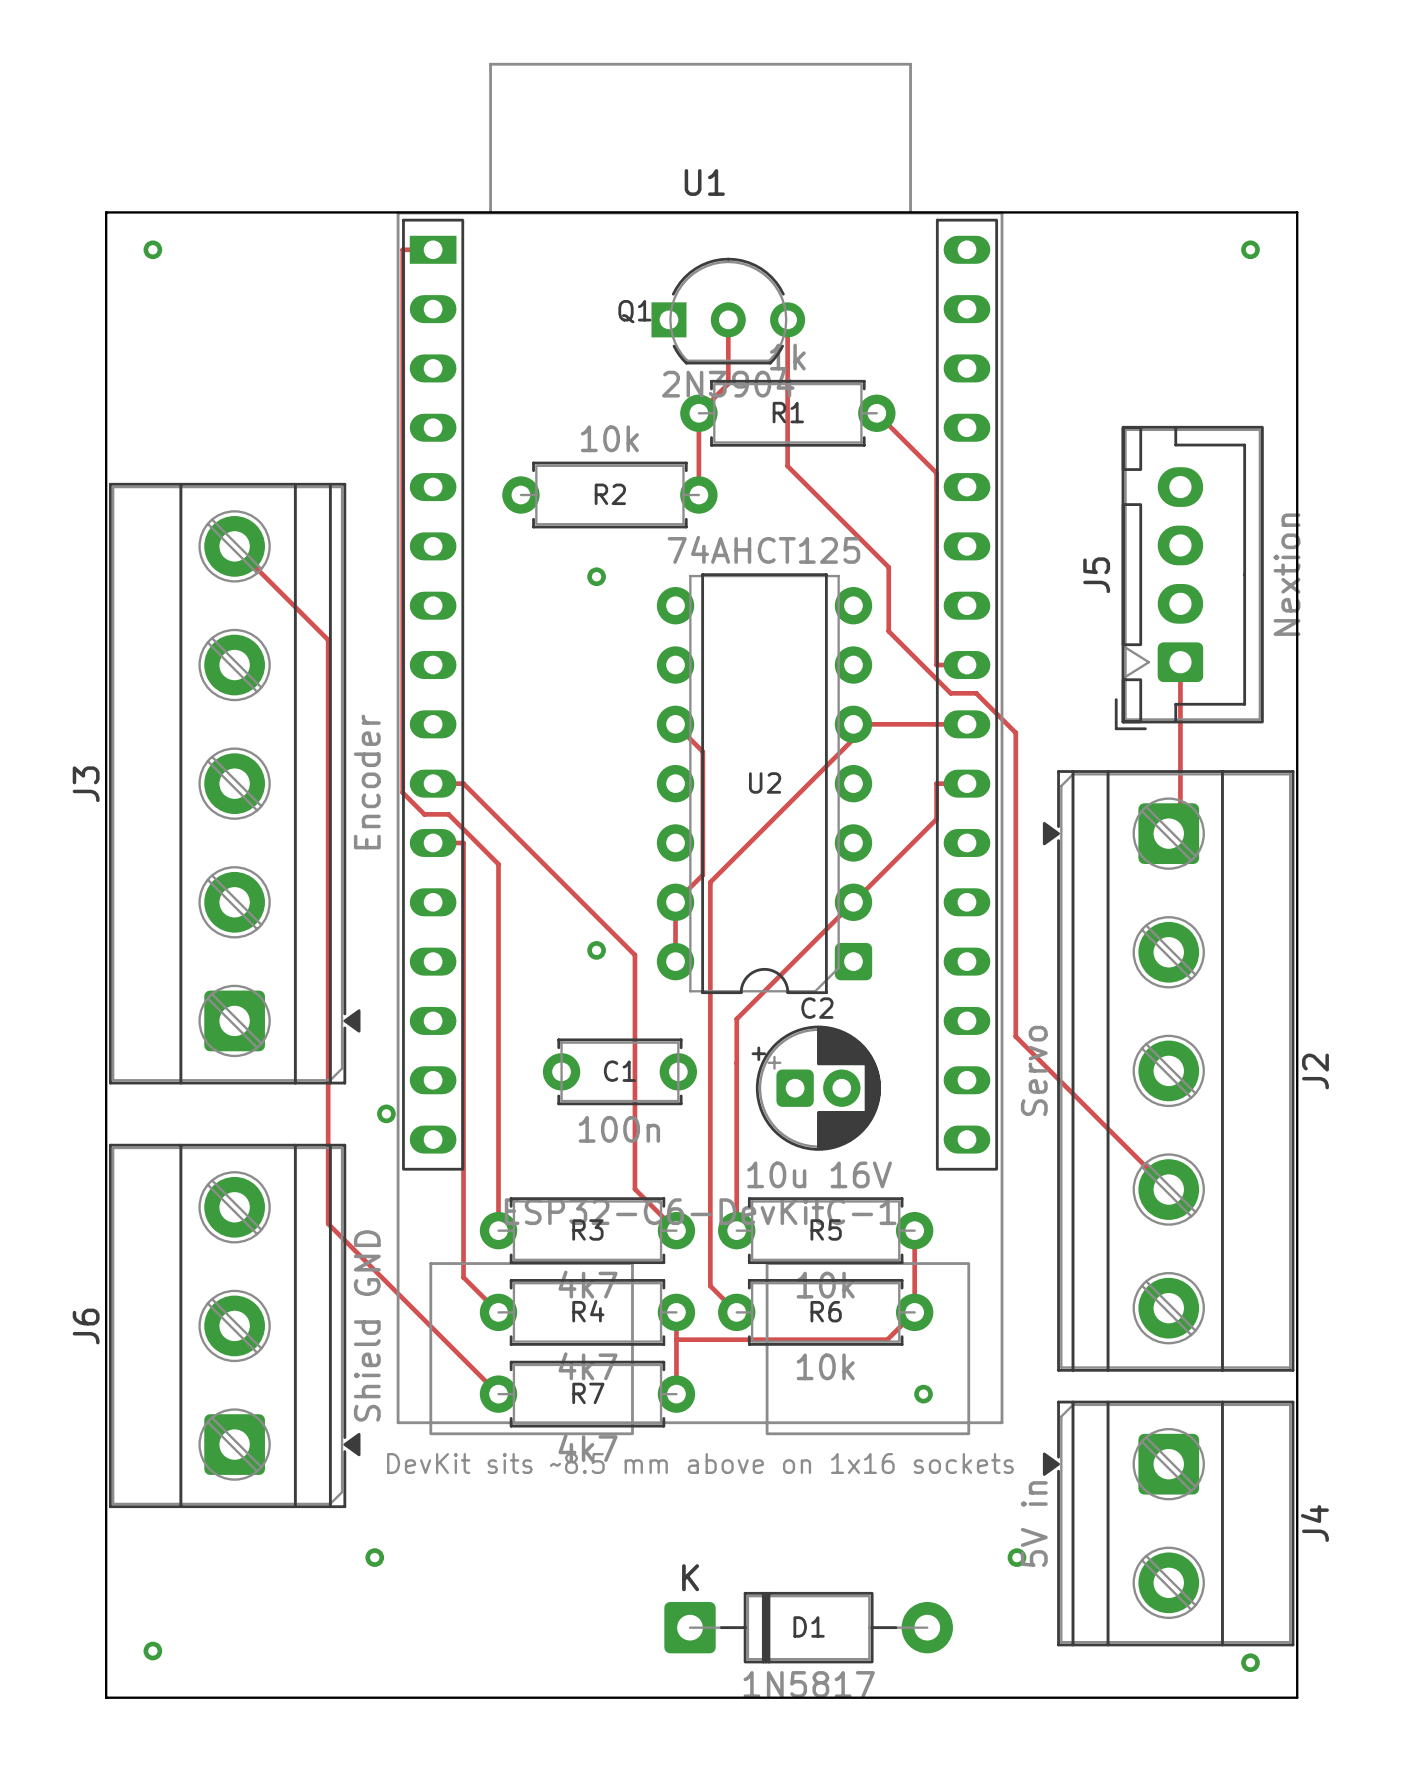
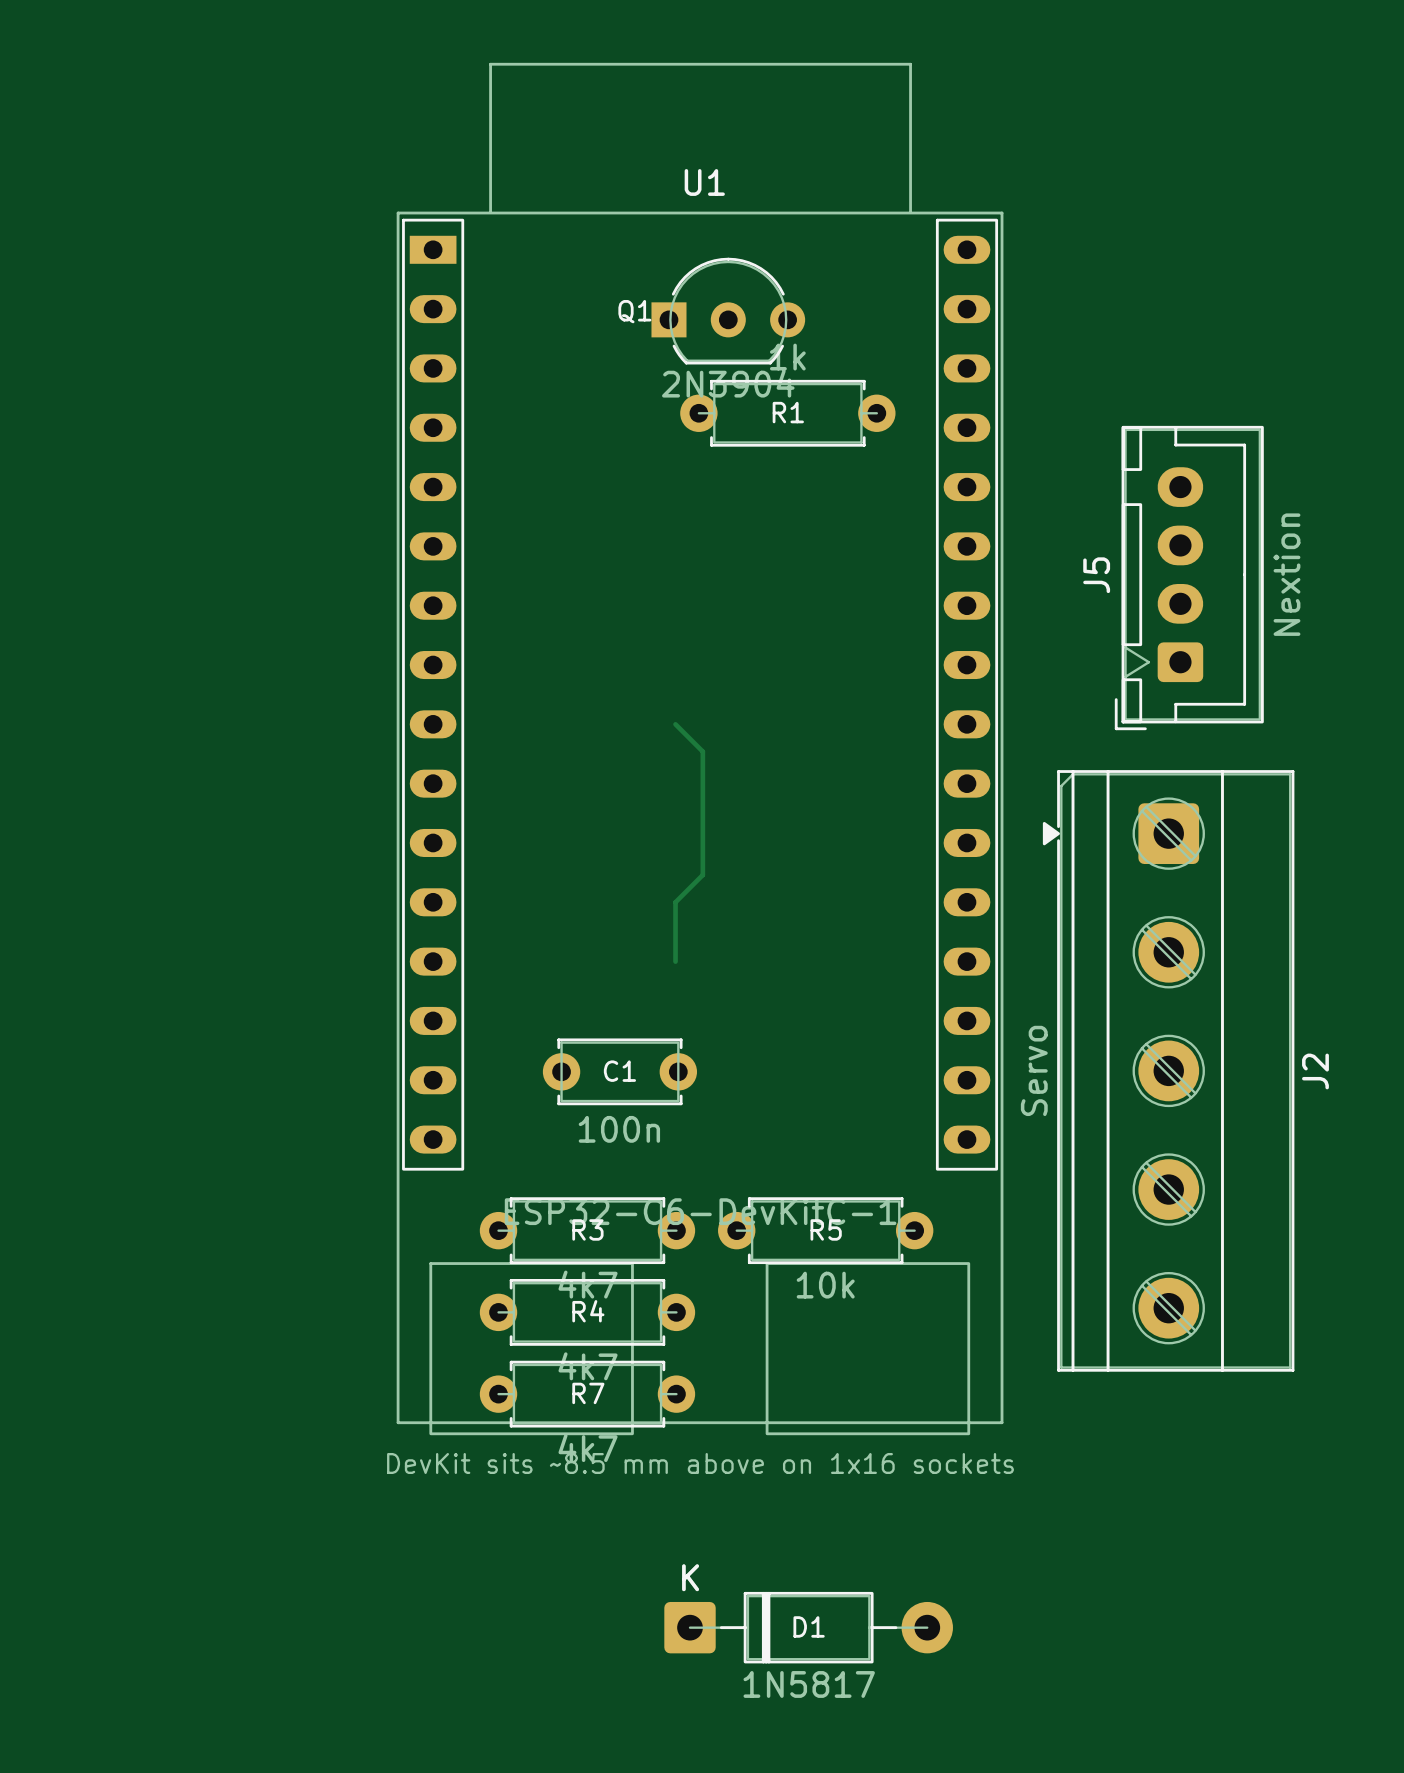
board edge: (106, 212) (1297, 212) (1297, 1697) (106, 1697) (106, 212) -> none
via: (152, 249) -> none
track: (433, 249) (402, 249) (402, 792) (424, 814) (448, 814) (498, 864) (498, 1230) -> none
via: (1250, 249) -> none
track: (728, 319) (728, 383) (698, 413) (698, 495) -> none
track: (787, 319) (787, 466) (888, 567) (888, 631) (950, 693) (976, 693) (1015, 732) (1015, 1036) (1168, 1189) -> none
track: (876, 413) (936, 473) (936, 665) (966, 665) -> none
R2: 10k (609, 495) -> none
track: (234, 546) (328, 639) (328, 1223) (498, 1394) -> none
via: (596, 576) -> none
track: (1180, 662) (1180, 821) (1168, 833) -> none
track: (966, 724) (853, 724) (853, 739) (710, 882) (710, 1286) (736, 1312) -> none
J3: Encoder (234, 783) -> none
track: (433, 783) (463, 783) (634, 955) (634, 1189) (676, 1230) -> none
U2: 74AHCT125 (764, 783) -> none
track: (966, 783) (936, 783) (936, 819) (736, 1019) (736, 1230) -> none
track: (433, 842) (463, 842) (463, 1277) (498, 1312) -> none
via: (596, 950) -> none
C2: 10u 16V (816, 1088) -> none
via: (386, 1113) -> none
track: (914, 1230) (914, 1312) (887, 1339) (676, 1339) -> none
track: (676, 1312) (676, 1394) -> none
R6: 10k (825, 1312) -> none
J6: Shield GND (234, 1325) -> none
via: (923, 1394) -> none
J4: 5V in (1168, 1523) -> none
via: (374, 1557) -> none
via: (1016, 1557) -> none
via: (152, 1651) -> none
via: (1250, 1662) -> none

